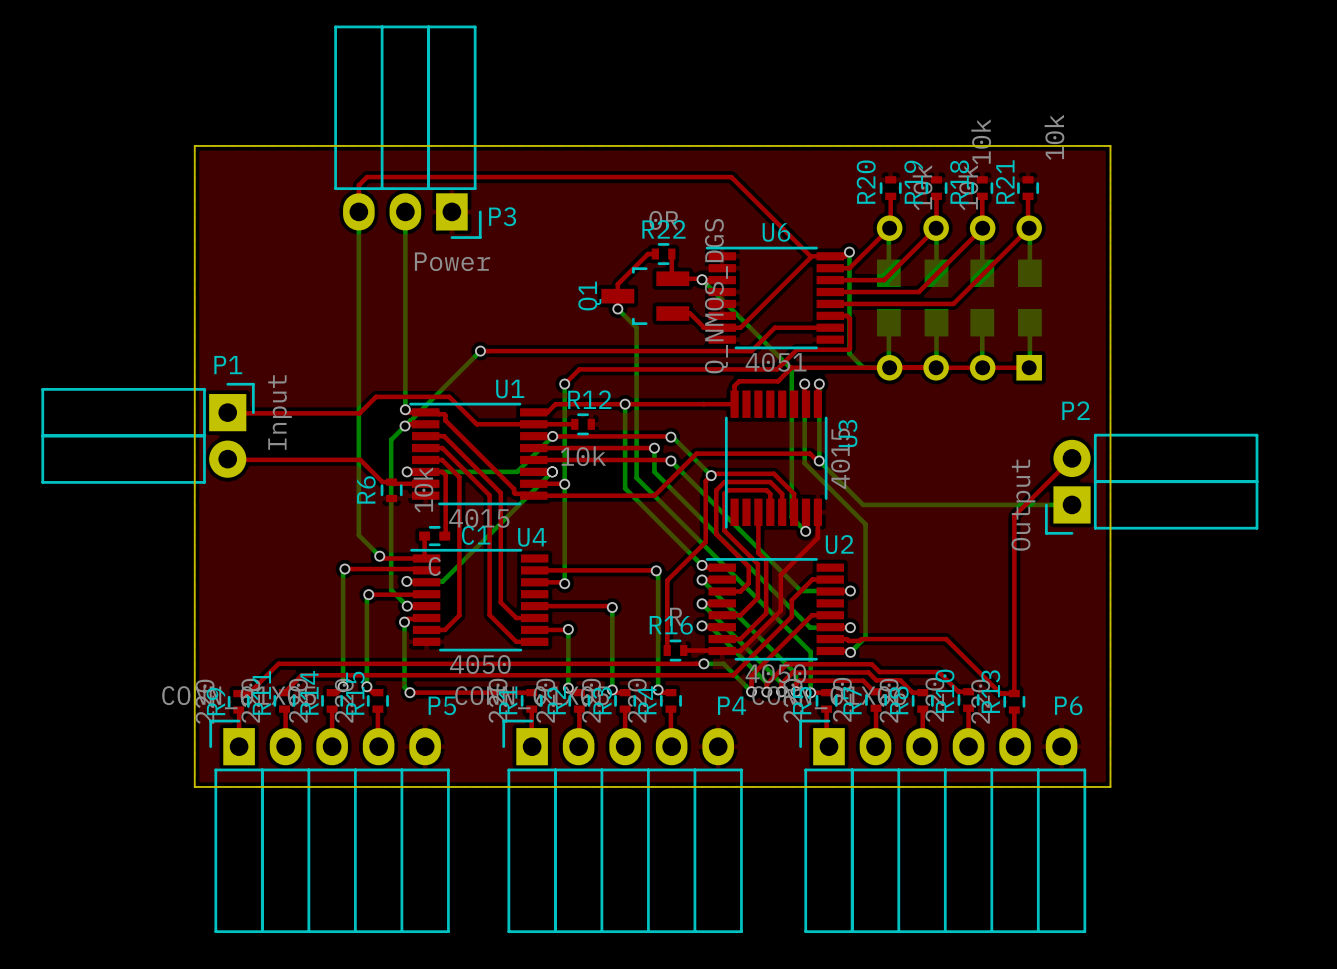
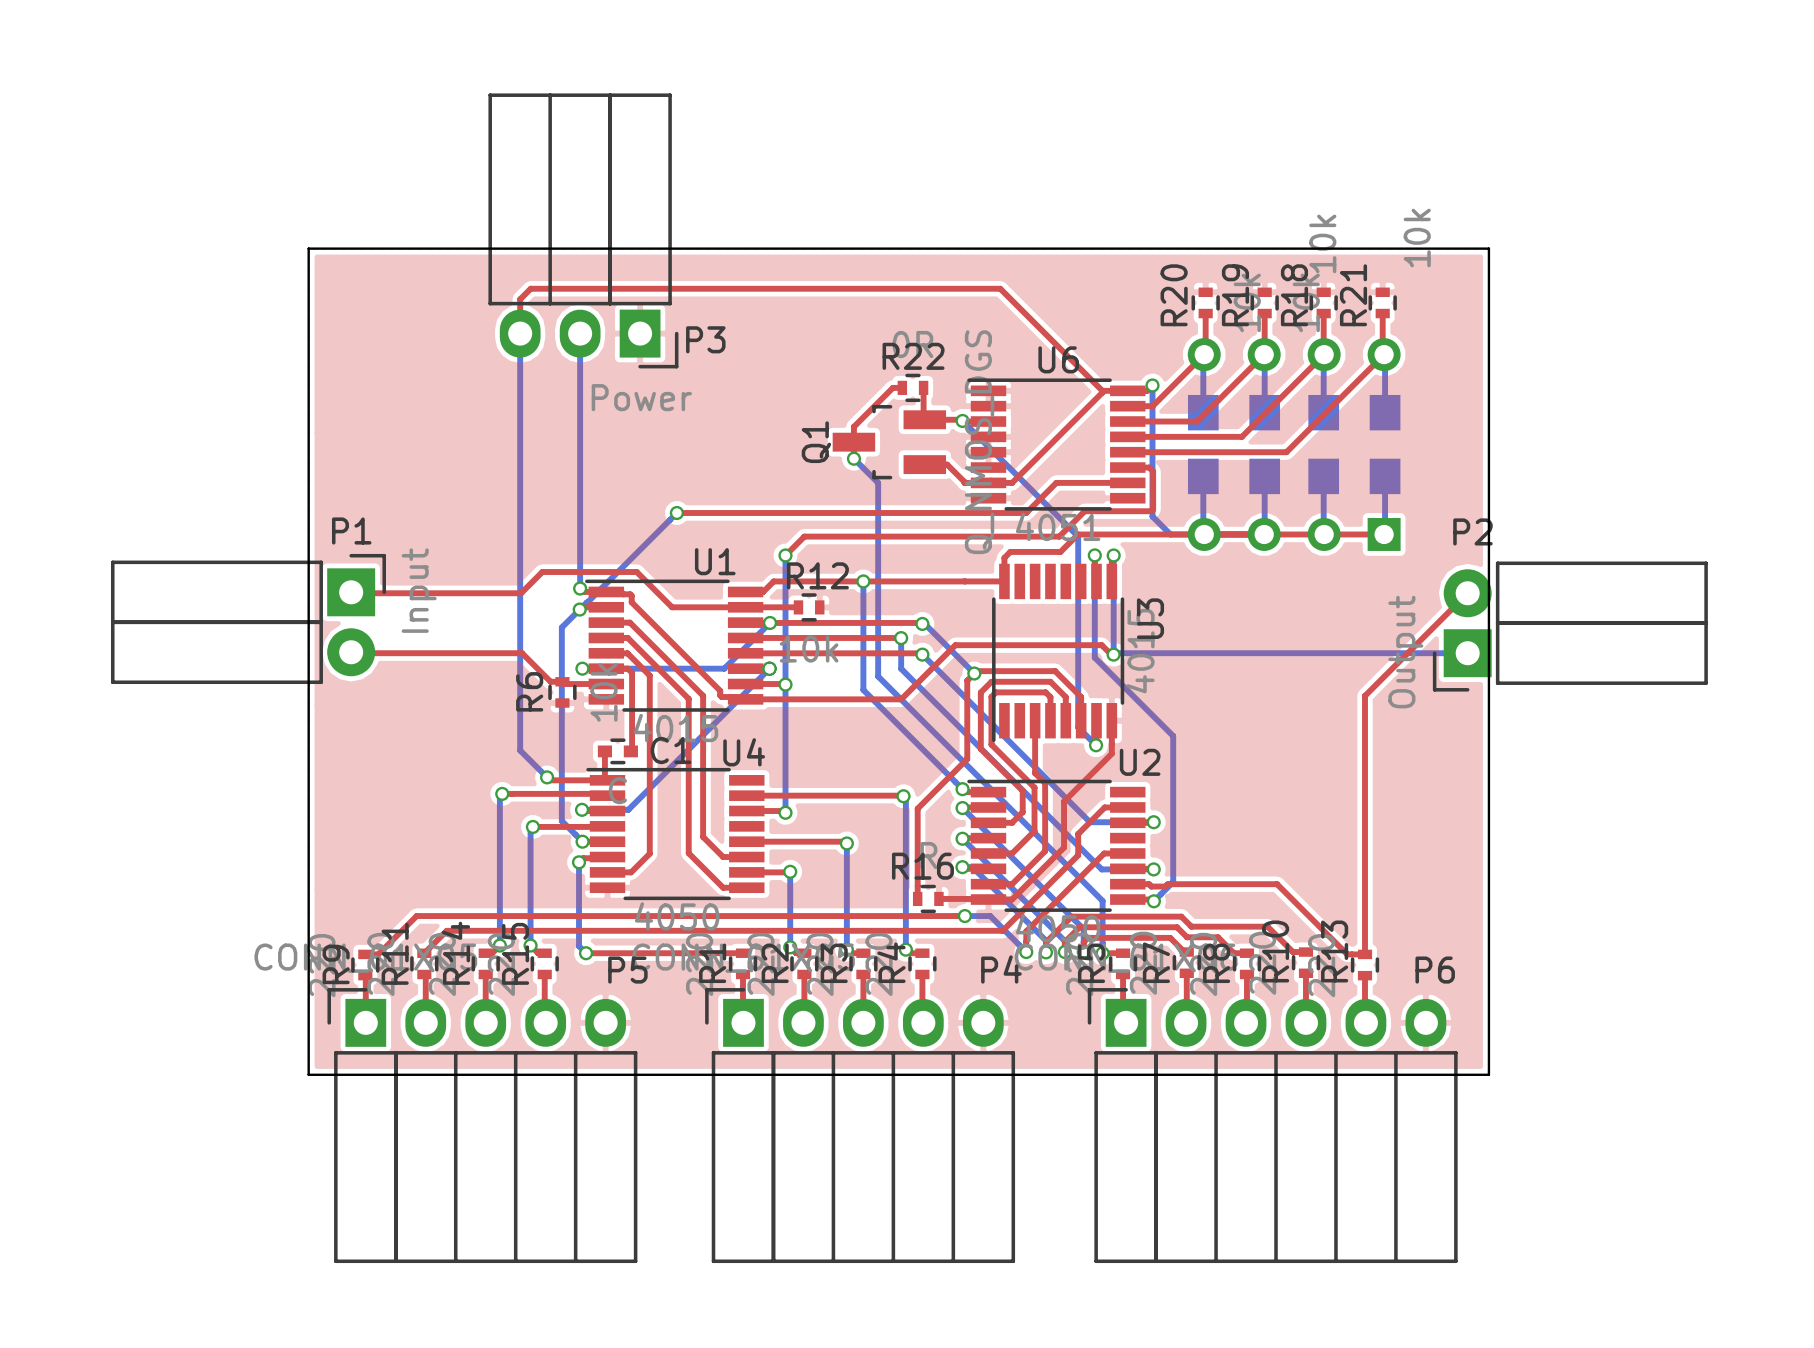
top track: (1072, 458) (1014, 516) -> (1467, 593) (1365, 695) (1365, 725)
bottom track: (819, 460) (863, 504) (1072, 504) -> (1113, 654) (1467, 653)
P2 position: (1151, 484) -> (1570, 626)

